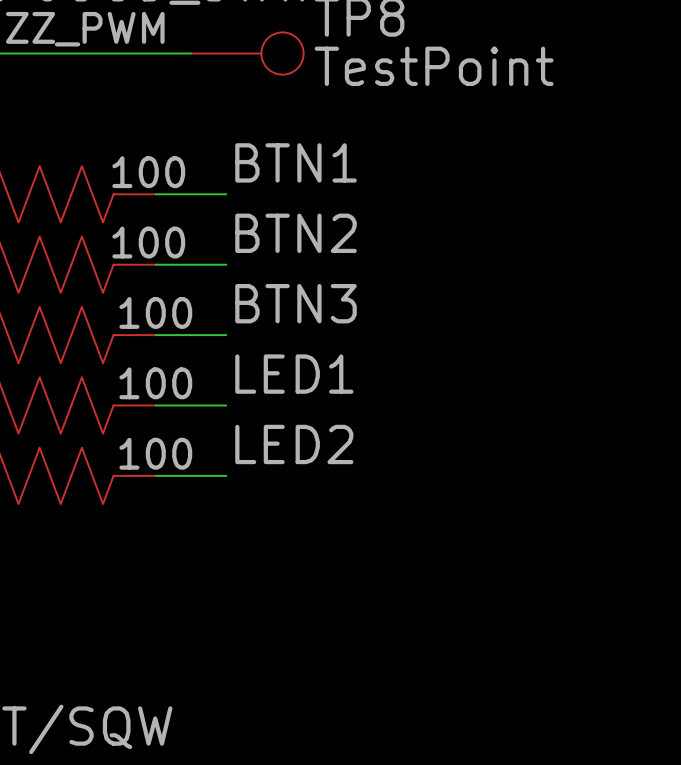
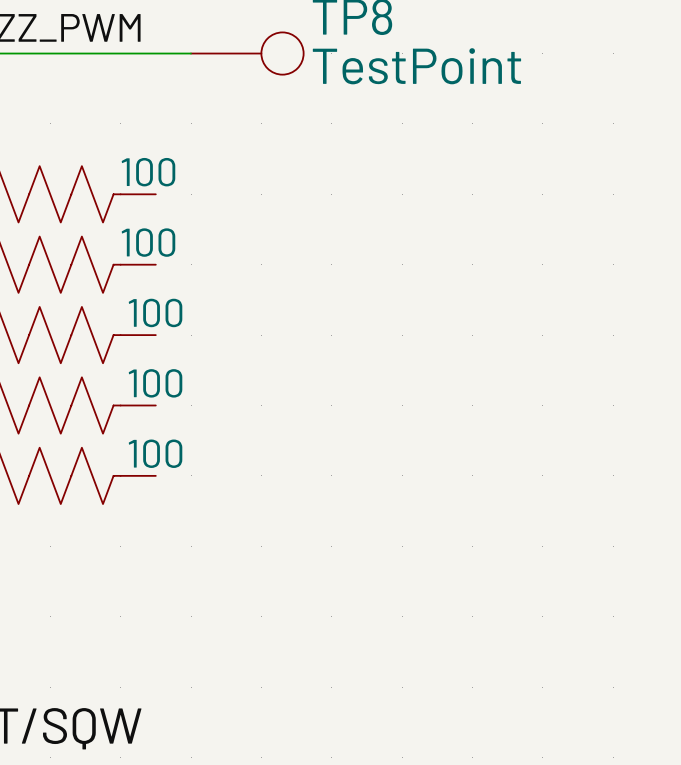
label: BTN1 (296, 162) -> none
wire: (155, 194) (226, 194) -> none
label: BTN2 (296, 233) -> none
wire: (155, 264) (226, 264) -> none
label: BTN3 (296, 303) -> none
wire: (155, 335) (226, 335) -> none
label: LED1 (294, 374) -> none
wire: (155, 405) (226, 405) -> none
label: LED2 (294, 444) -> none
wire: (155, 475) (226, 475) -> none

